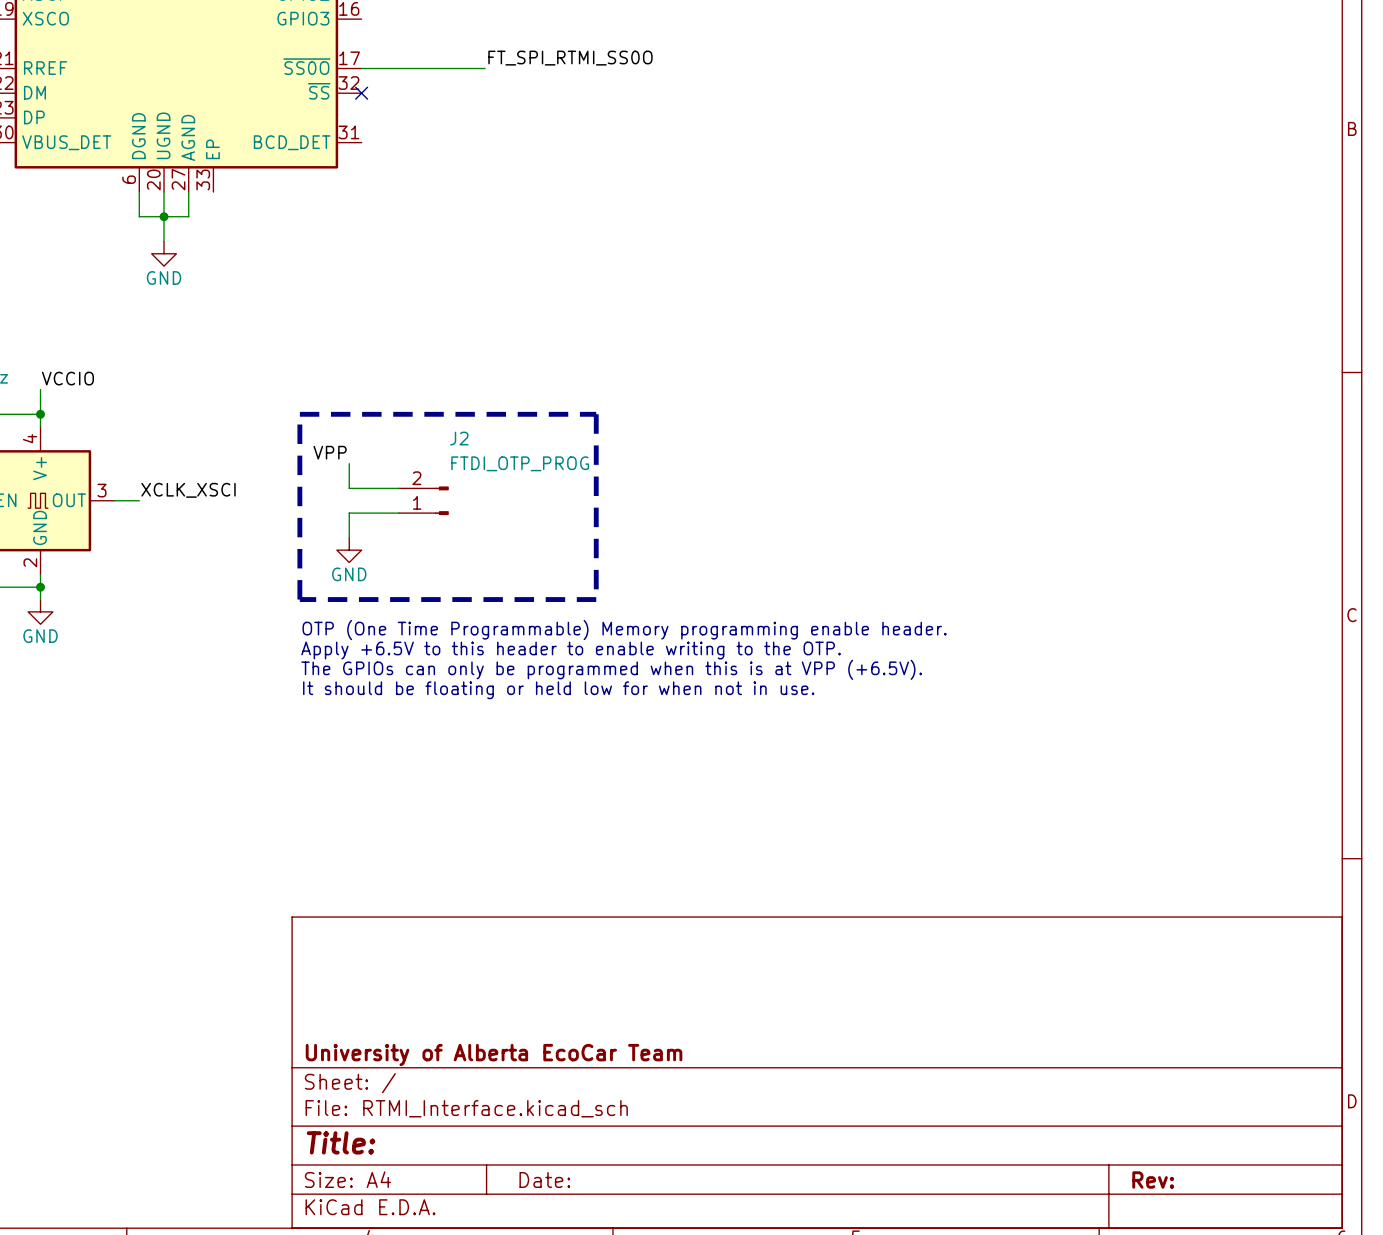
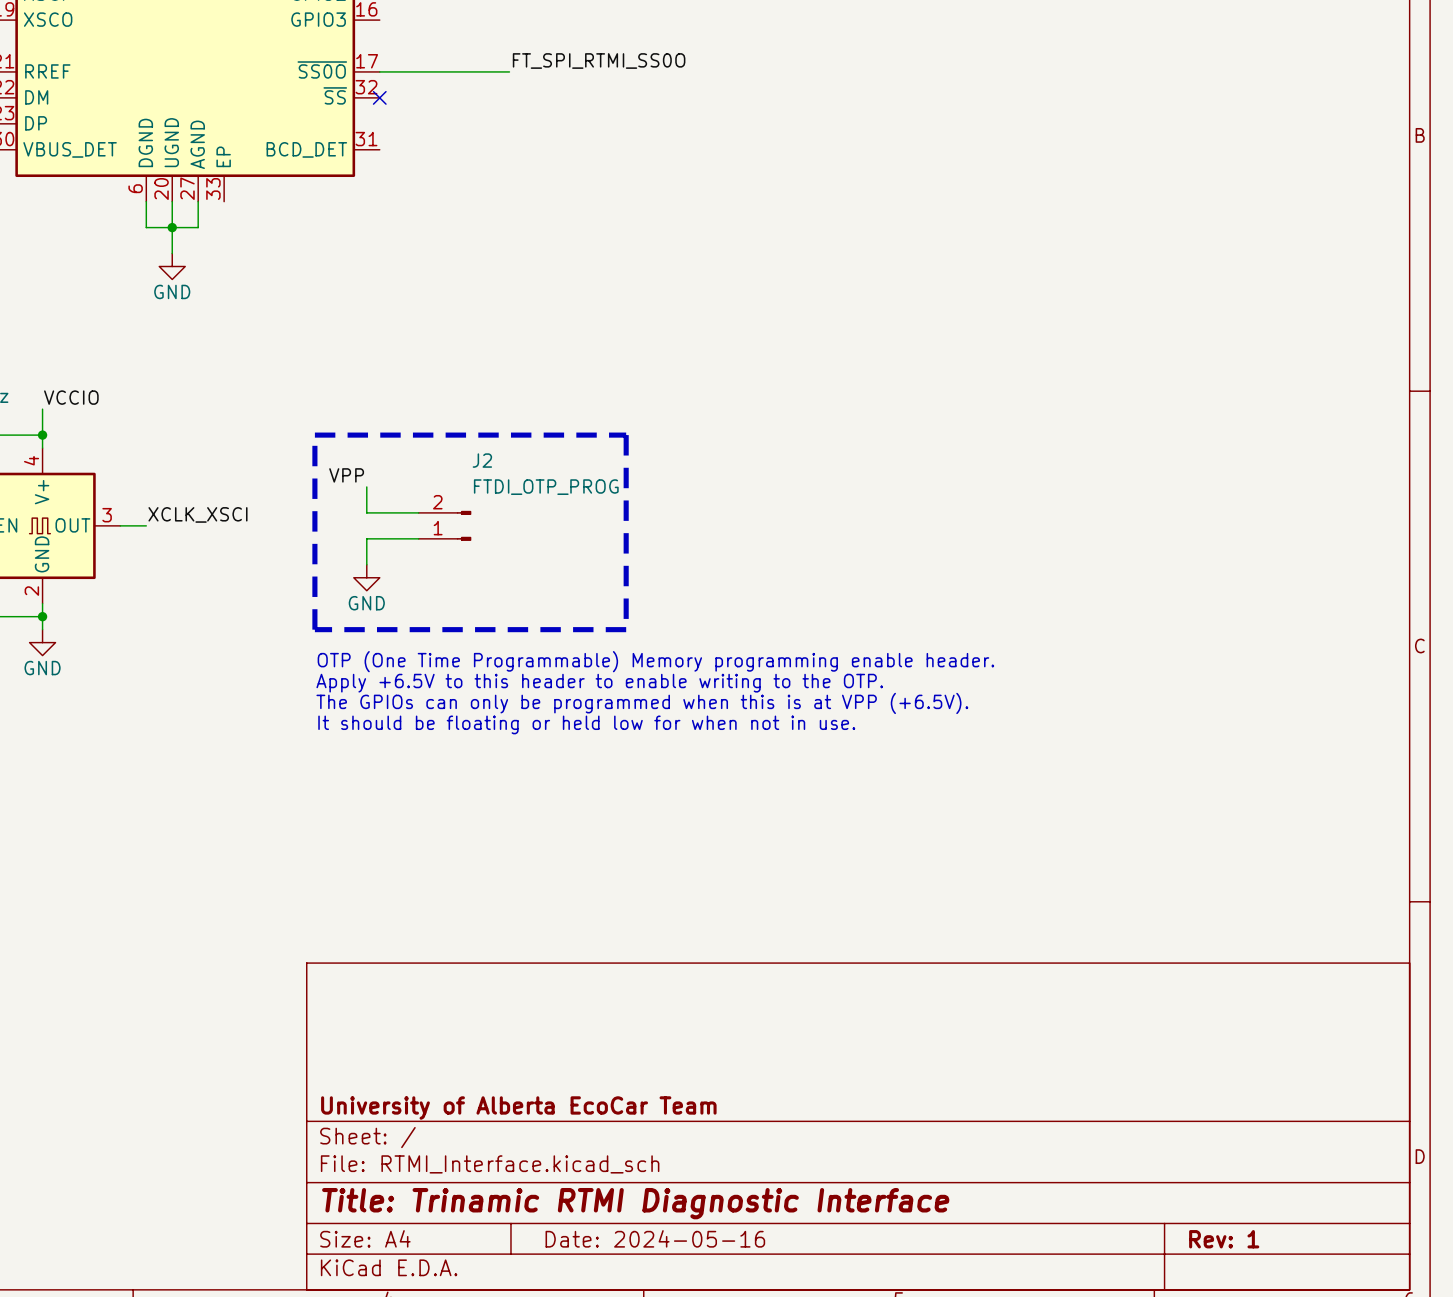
title block: Title: (341, 1142) -> Title: Trinamic RTMI Diagnostic Interface (635, 1203)
title block: Date: (544, 1180) -> Date: 2024-05-16 (655, 1238)
title block: Rev: (1153, 1180) -> Rev: 1 (1224, 1239)

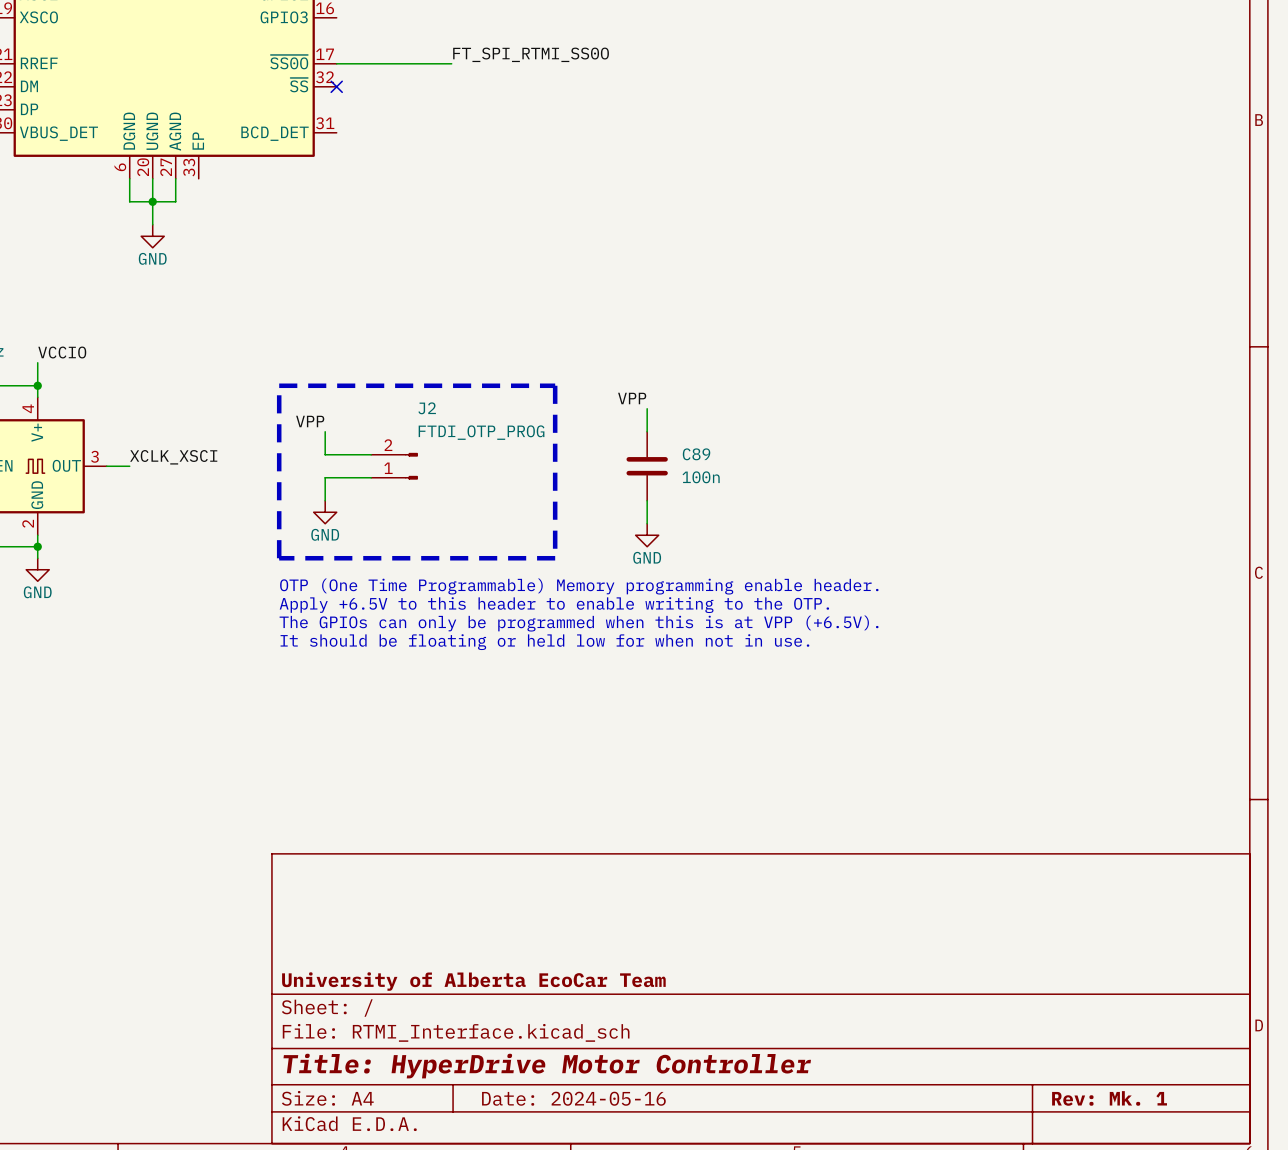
label: none -> VPP (632, 398)
wire: none -> (647, 408) (647, 431)
C89: none -> 100n (647, 466)
wire: none -> (647, 500) (647, 523)
power symbol: none -> GND (647, 535)
title block: Title: Trinamic RTMI Diagnostic Interface (635, 1203) -> Title: HyperDrive Motor Controller (547, 1066)
title block: Rev: 1 (1224, 1239) -> Rev: Mk. 1 (1109, 1098)

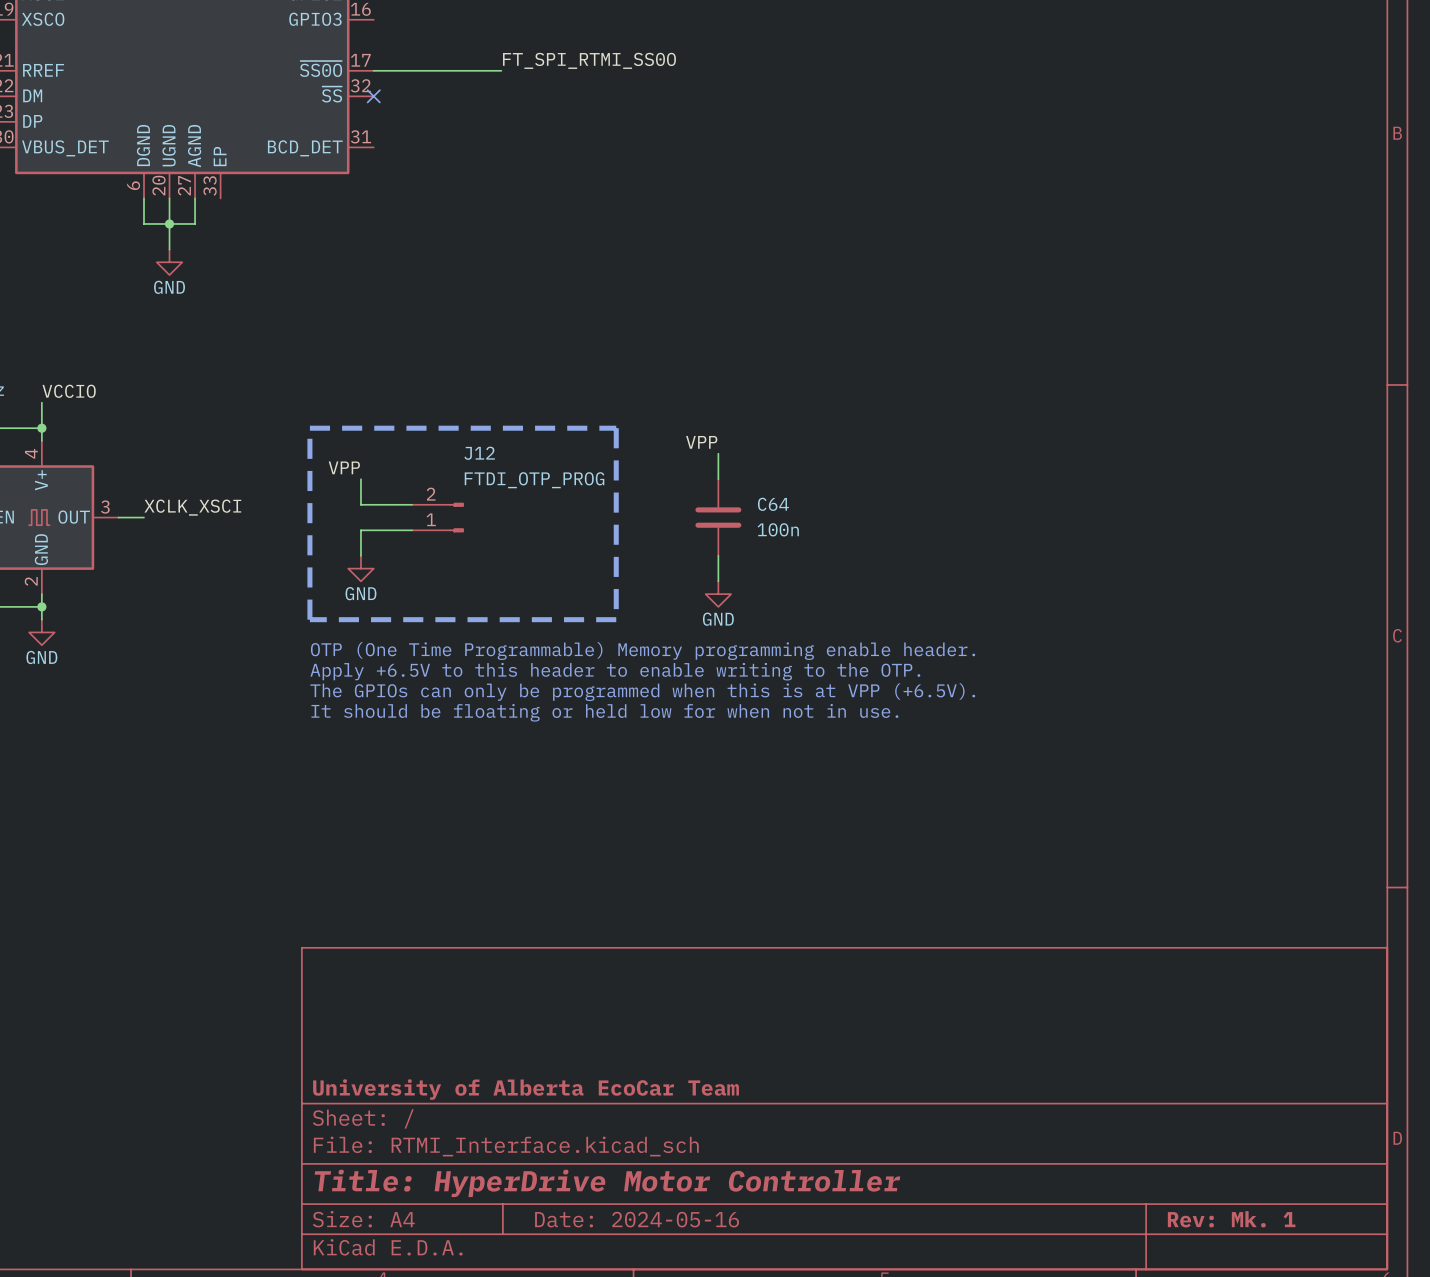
J2 name: J2 (427, 408) -> J12 (479, 453)
C89 name: C89 (696, 454) -> C64 (773, 504)

